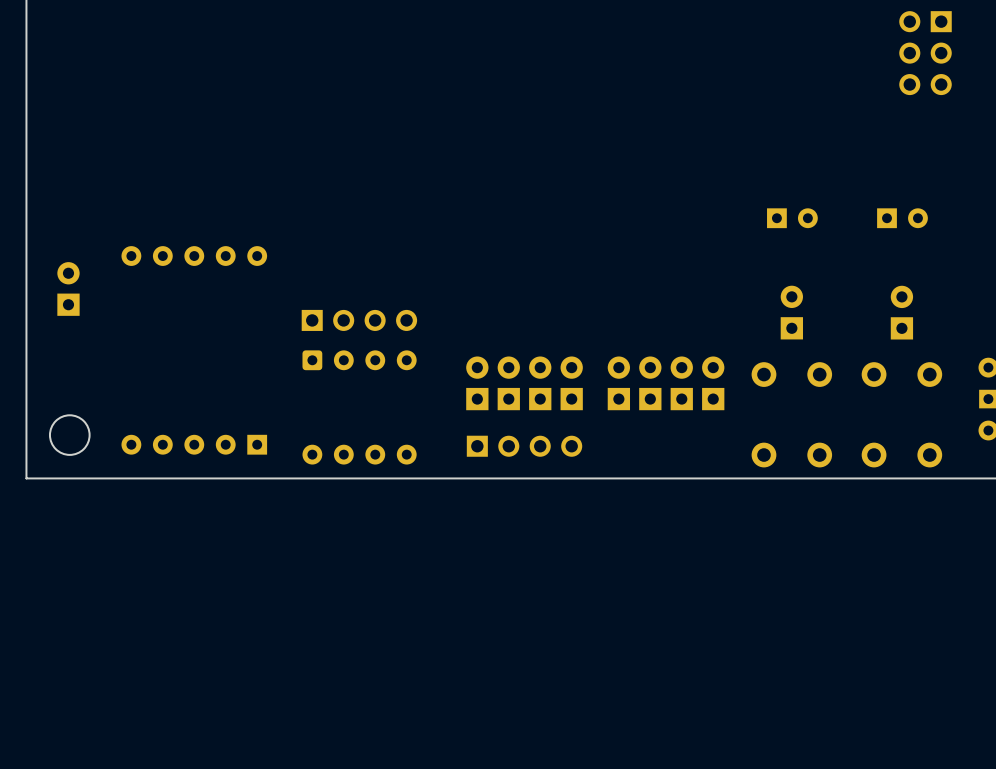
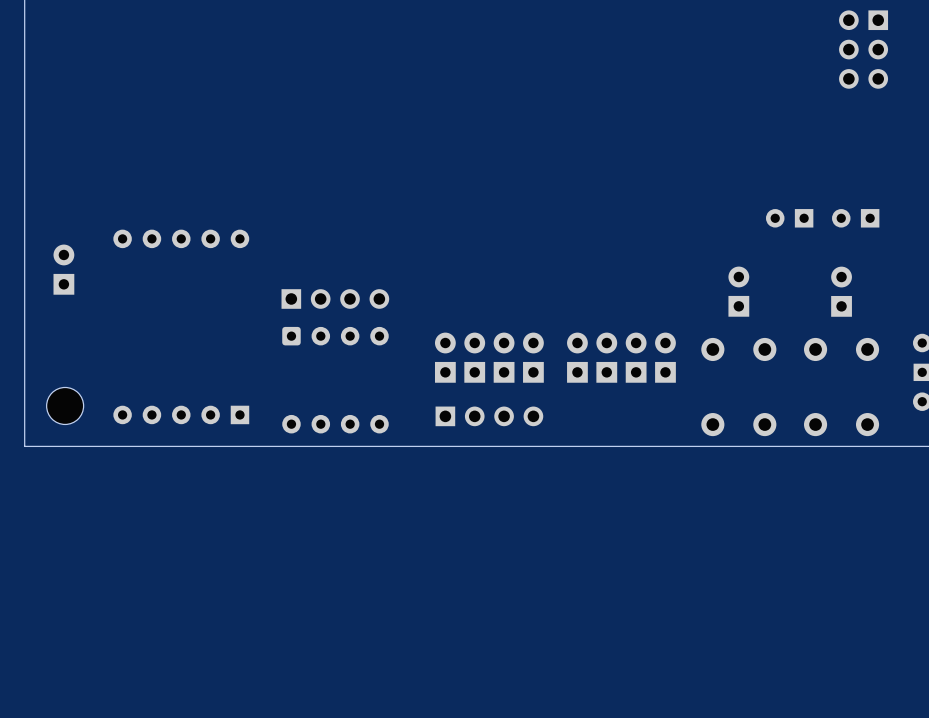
part: (792, 218) -> none
part rotation: 0° (902, 218) -> 180° (855, 218)
part: none -> (789, 218)

